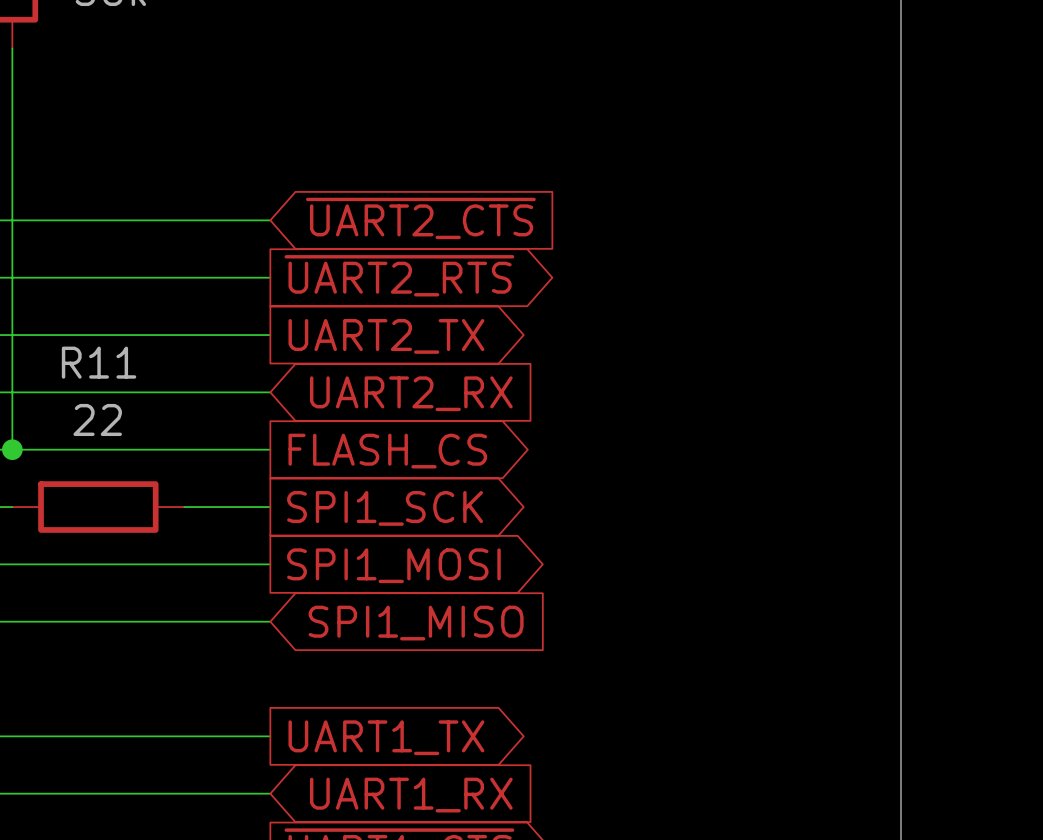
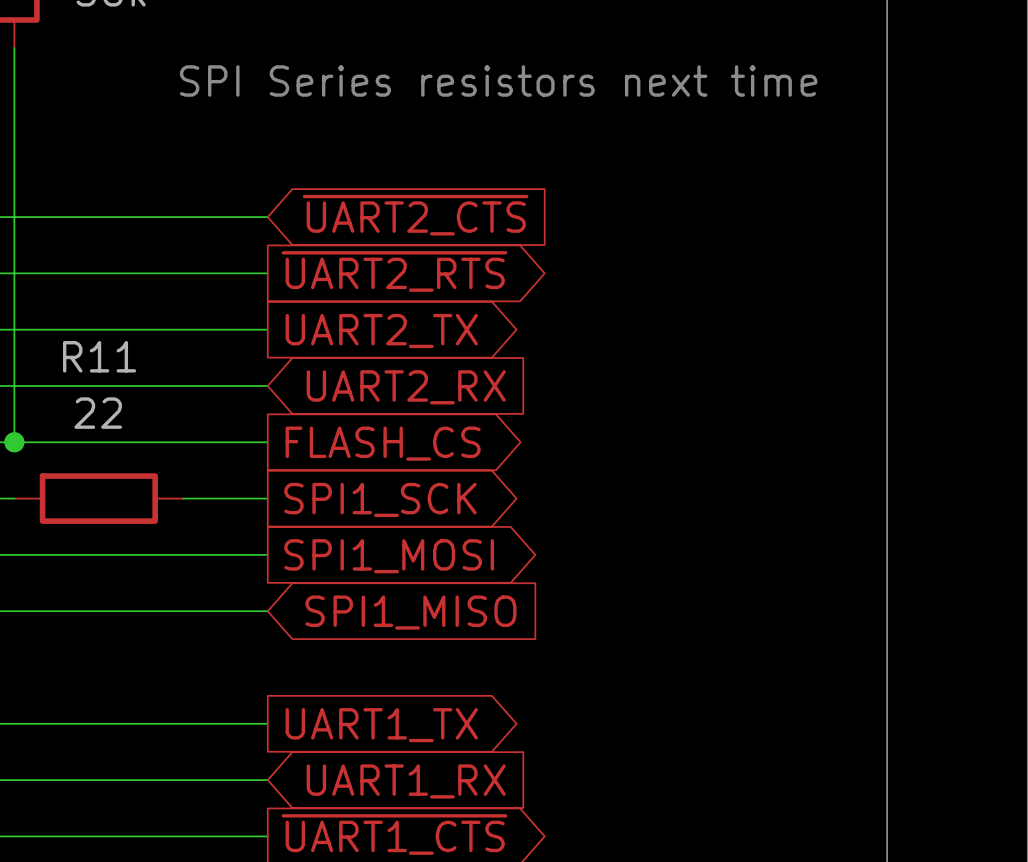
text: none -> SPI Series resistors next time (498, 80)

